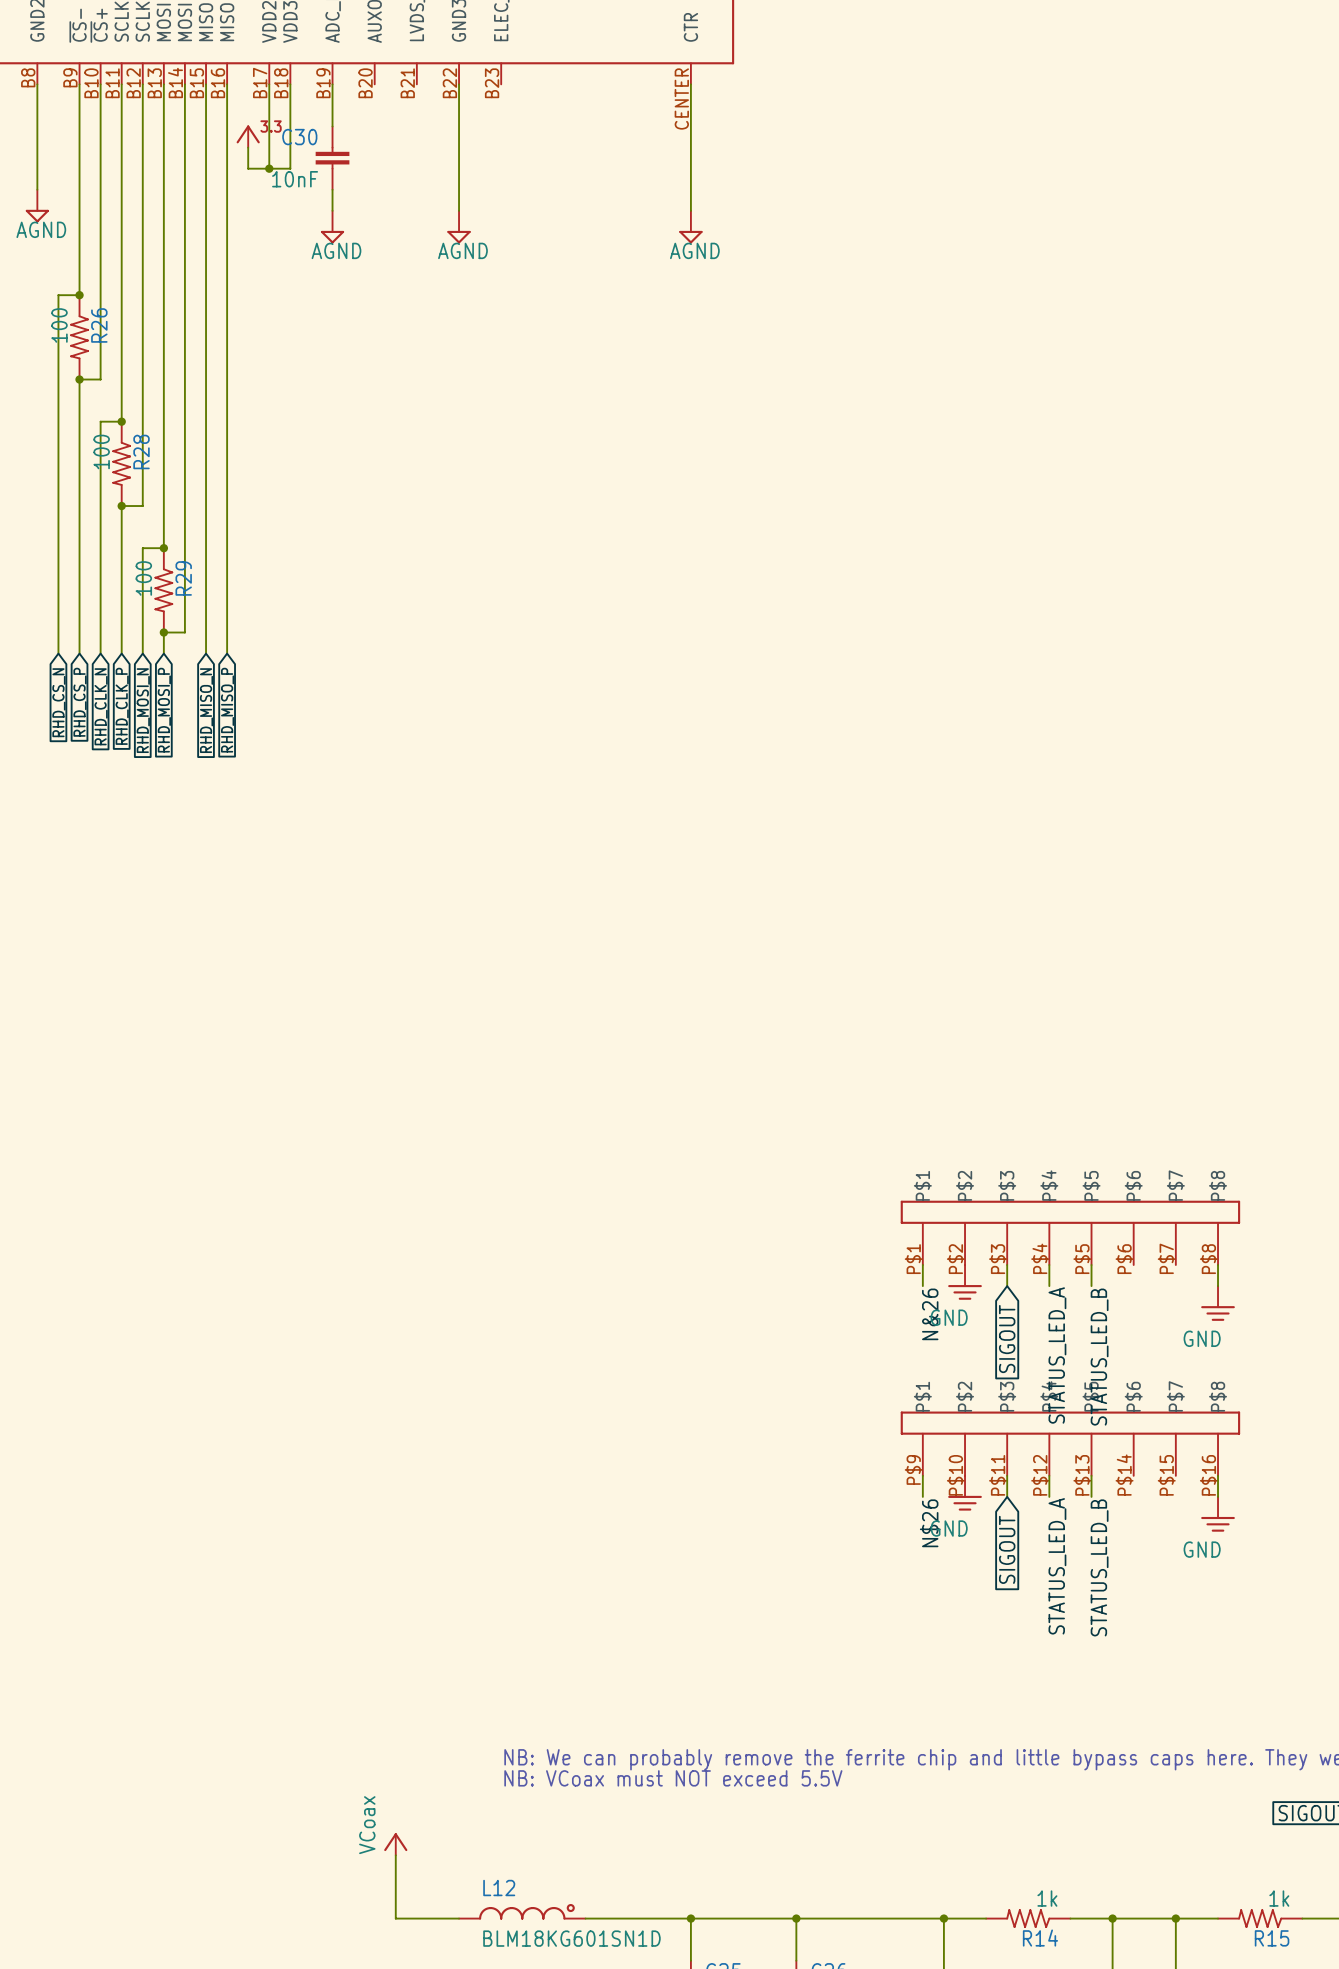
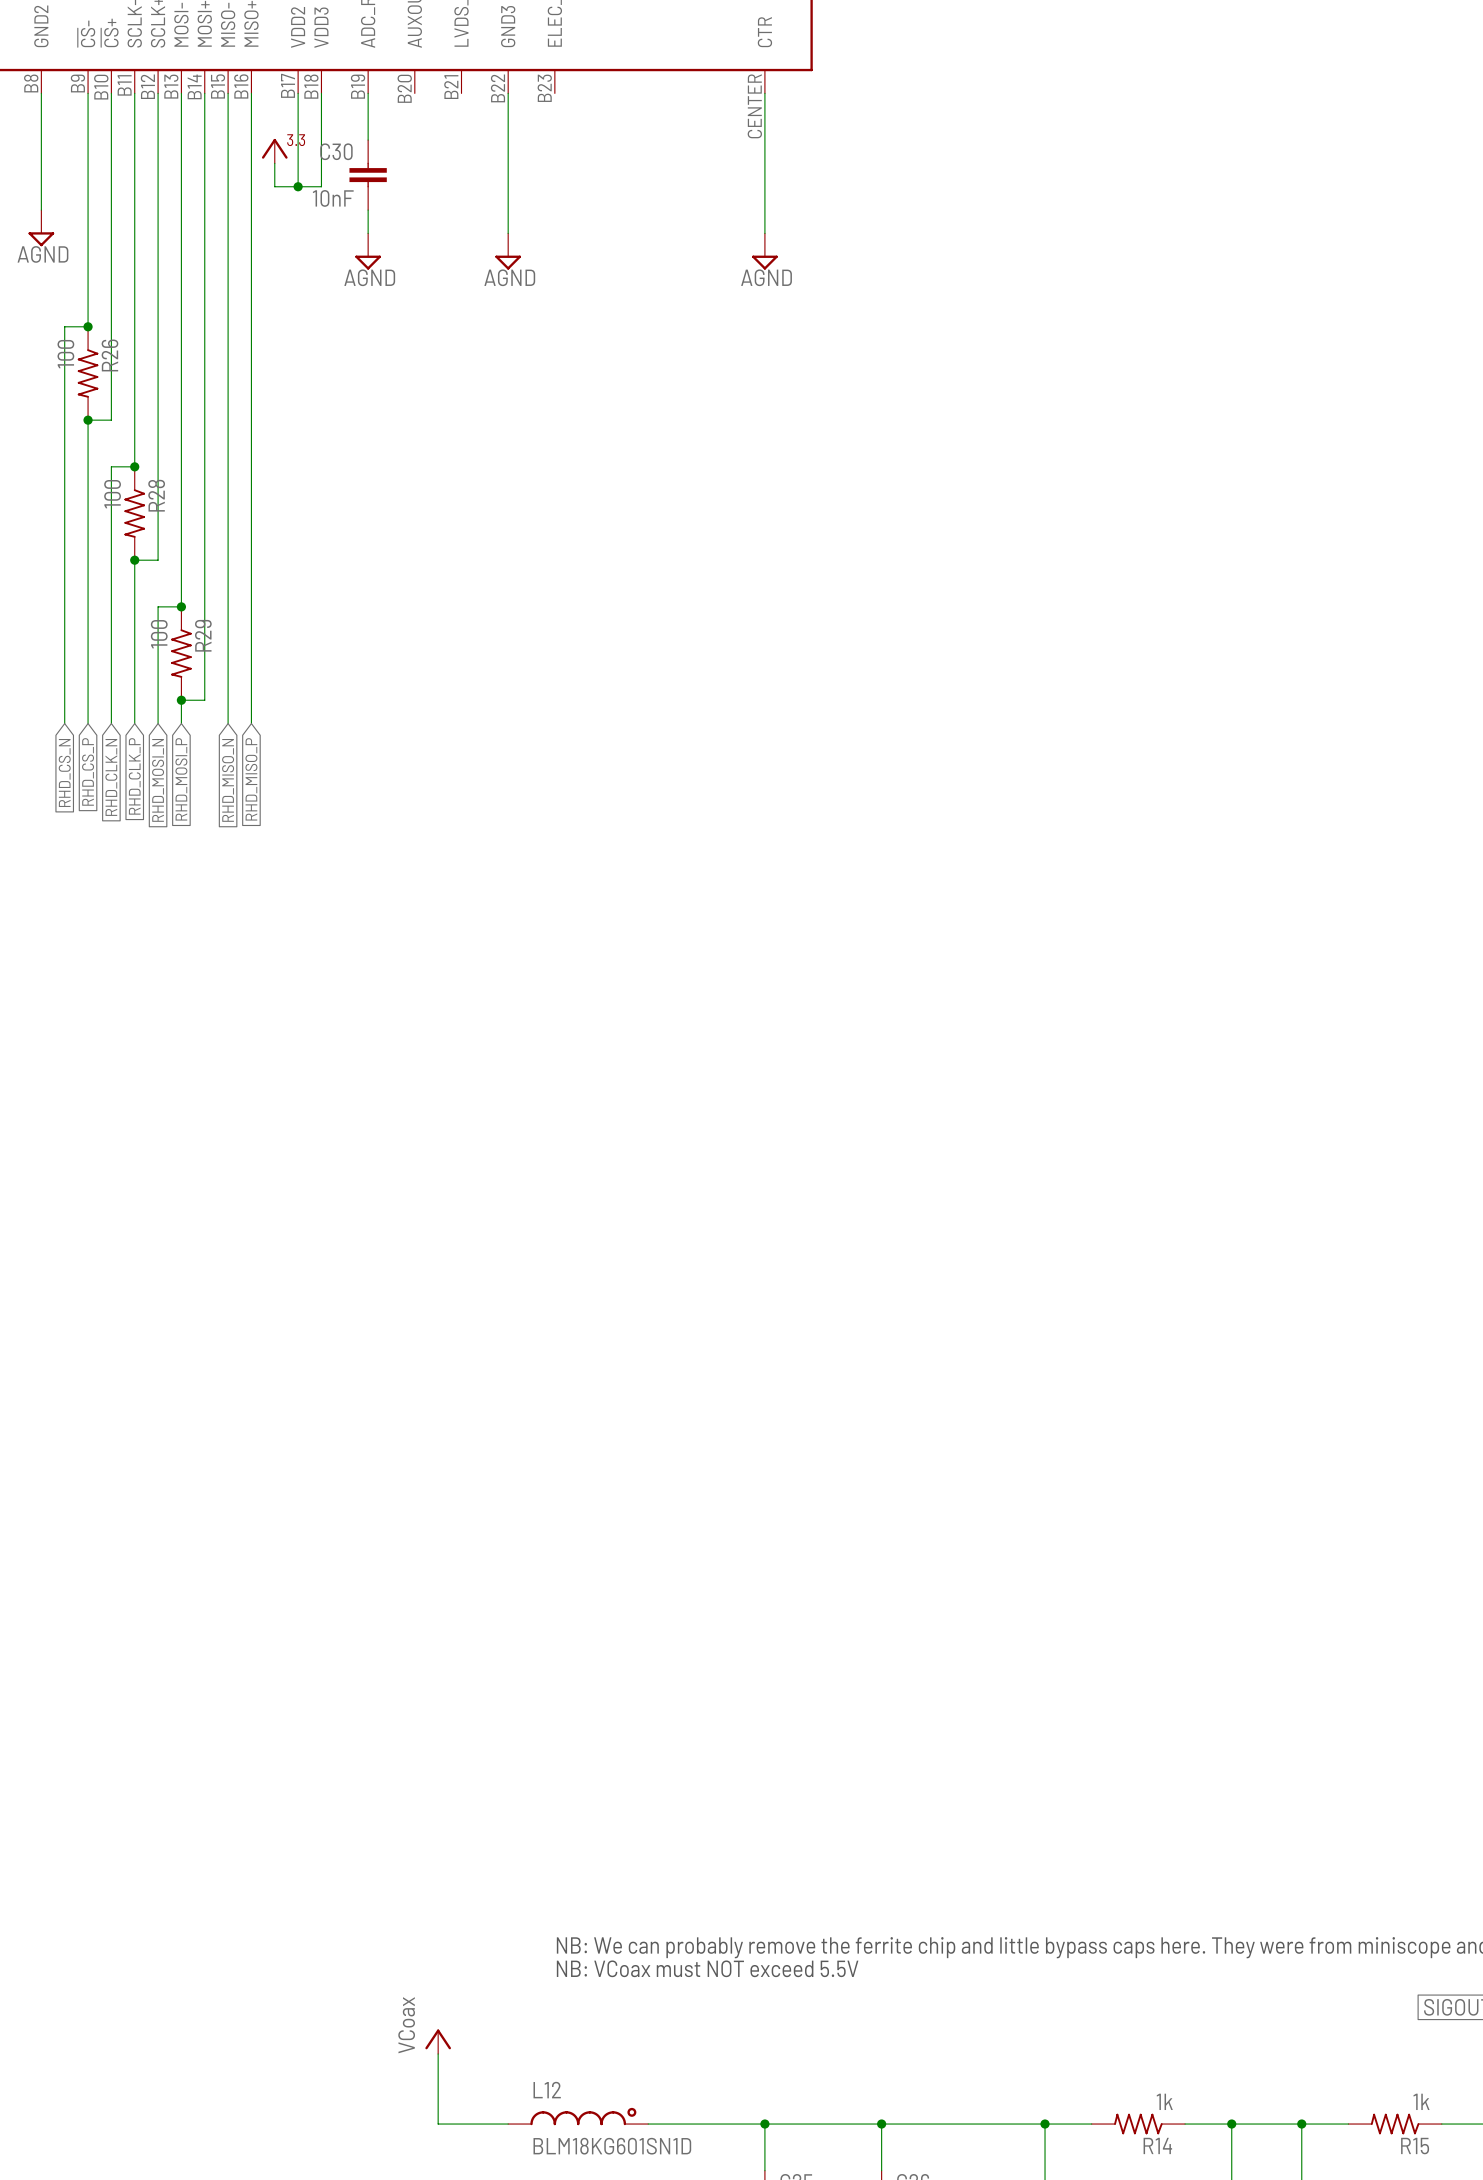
part: (1070, 1232) -> none
wire: (922, 1265) (922, 1286) -> none
wire: (1007, 1265) (1007, 1286) -> none
wire: (1049, 1265) (1049, 1286) -> none
wire: (1091, 1265) (1091, 1286) -> none
wire: (1218, 1265) (1218, 1286) -> none
power symbol: GND (965, 1282) -> none
power symbol: GND (1218, 1303) -> none
label: N&26 (930, 1314) -> none
global label: SIGOUT (1007, 1339) -> none
label: STATUS_LED_A (1057, 1355) -> none
label: STATUS_LED_B (1099, 1357) -> none
part: (1070, 1443) -> none
wire: (922, 1475) (922, 1496) -> none
wire: (1007, 1475) (1007, 1496) -> none
wire: (1049, 1475) (1049, 1496) -> none
wire: (1091, 1475) (1091, 1496) -> none
wire: (1218, 1475) (1218, 1496) -> none
power symbol: GND (965, 1493) -> none
power symbol: GND (1218, 1514) -> none
label: N$26 (930, 1523) -> none
global label: SIGOUT (1007, 1549) -> none
label: STATUS_LED_A (1057, 1566) -> none
label: STATUS_LED_B (1099, 1567) -> none

